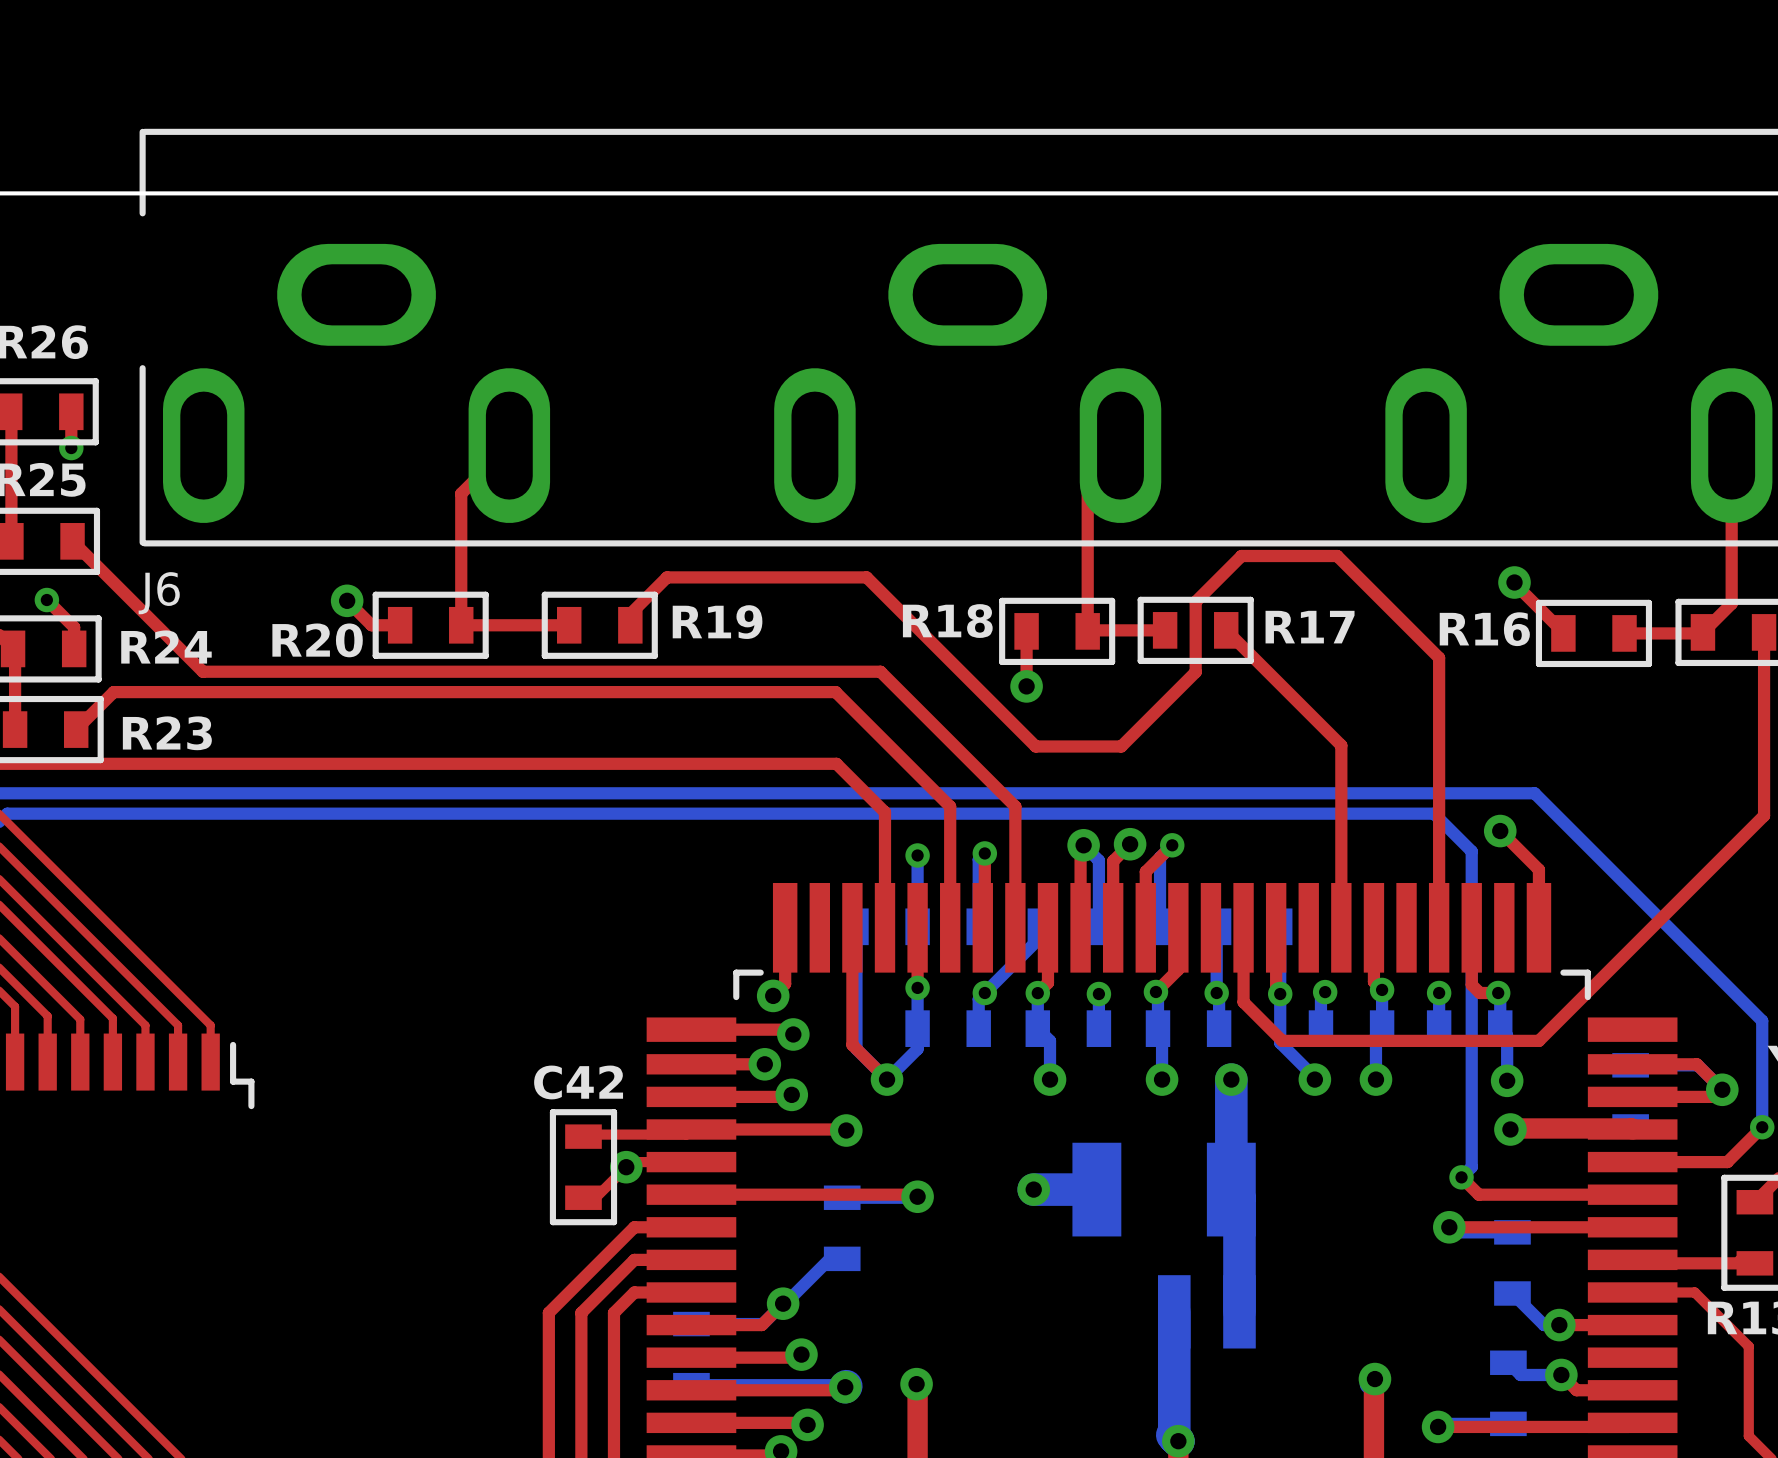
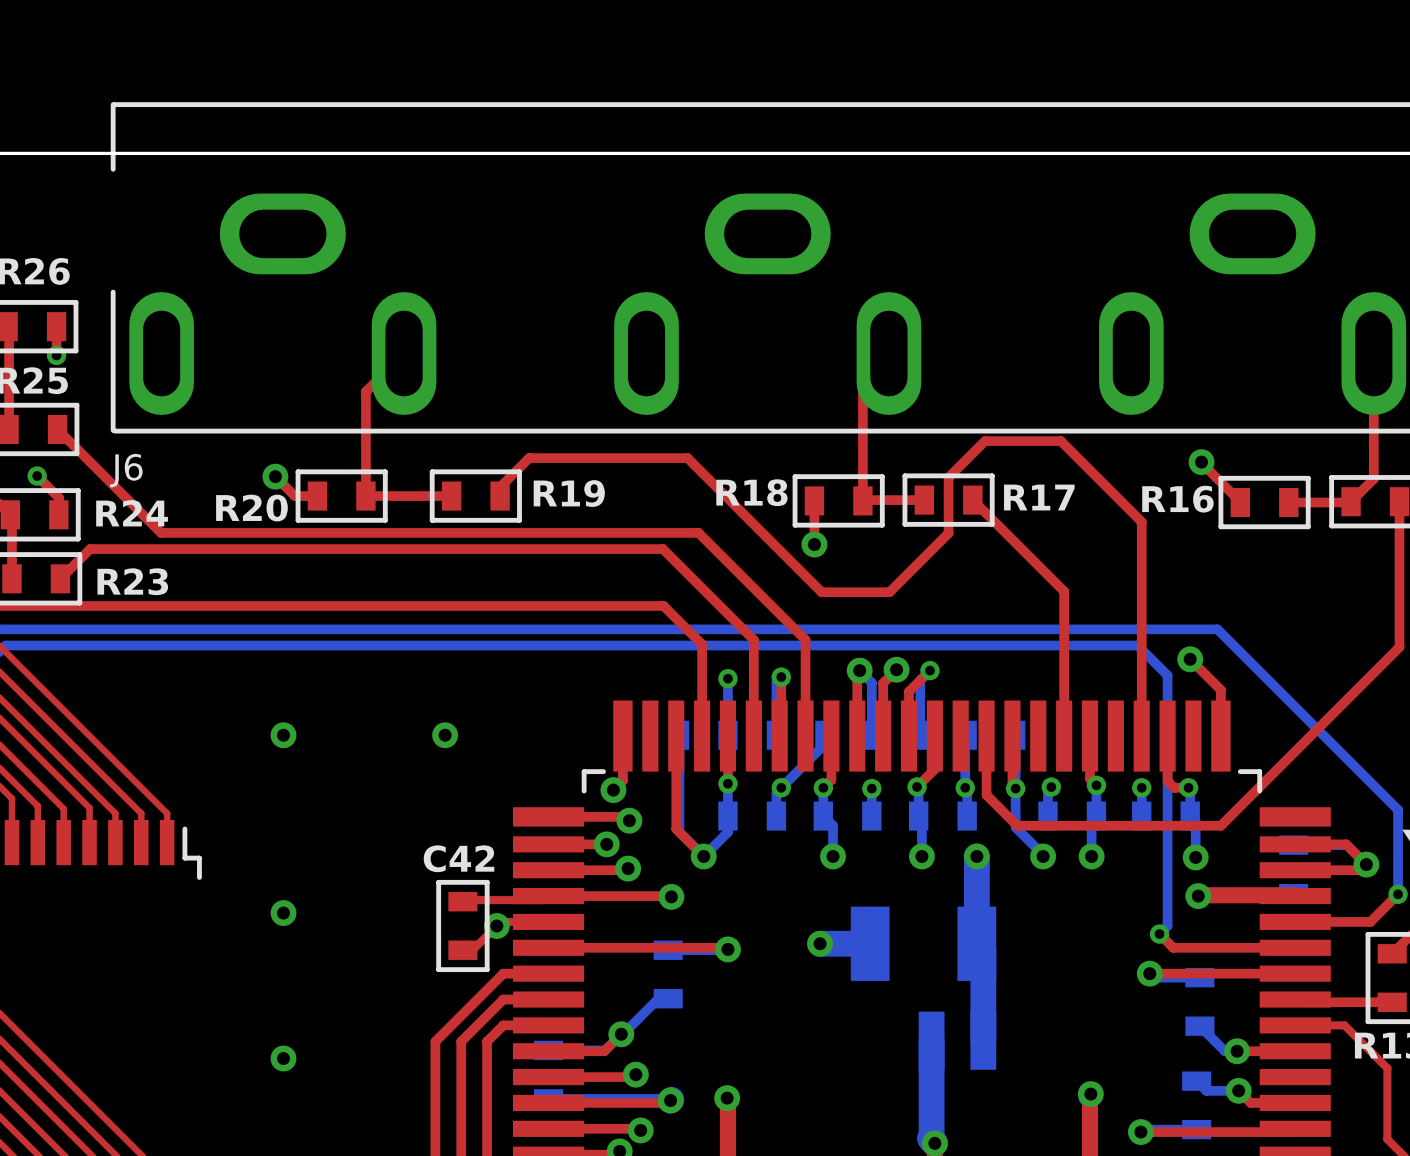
via: none -> (283, 735)
via: none -> (445, 735)
via: none -> (283, 913)
via: none -> (283, 1058)

